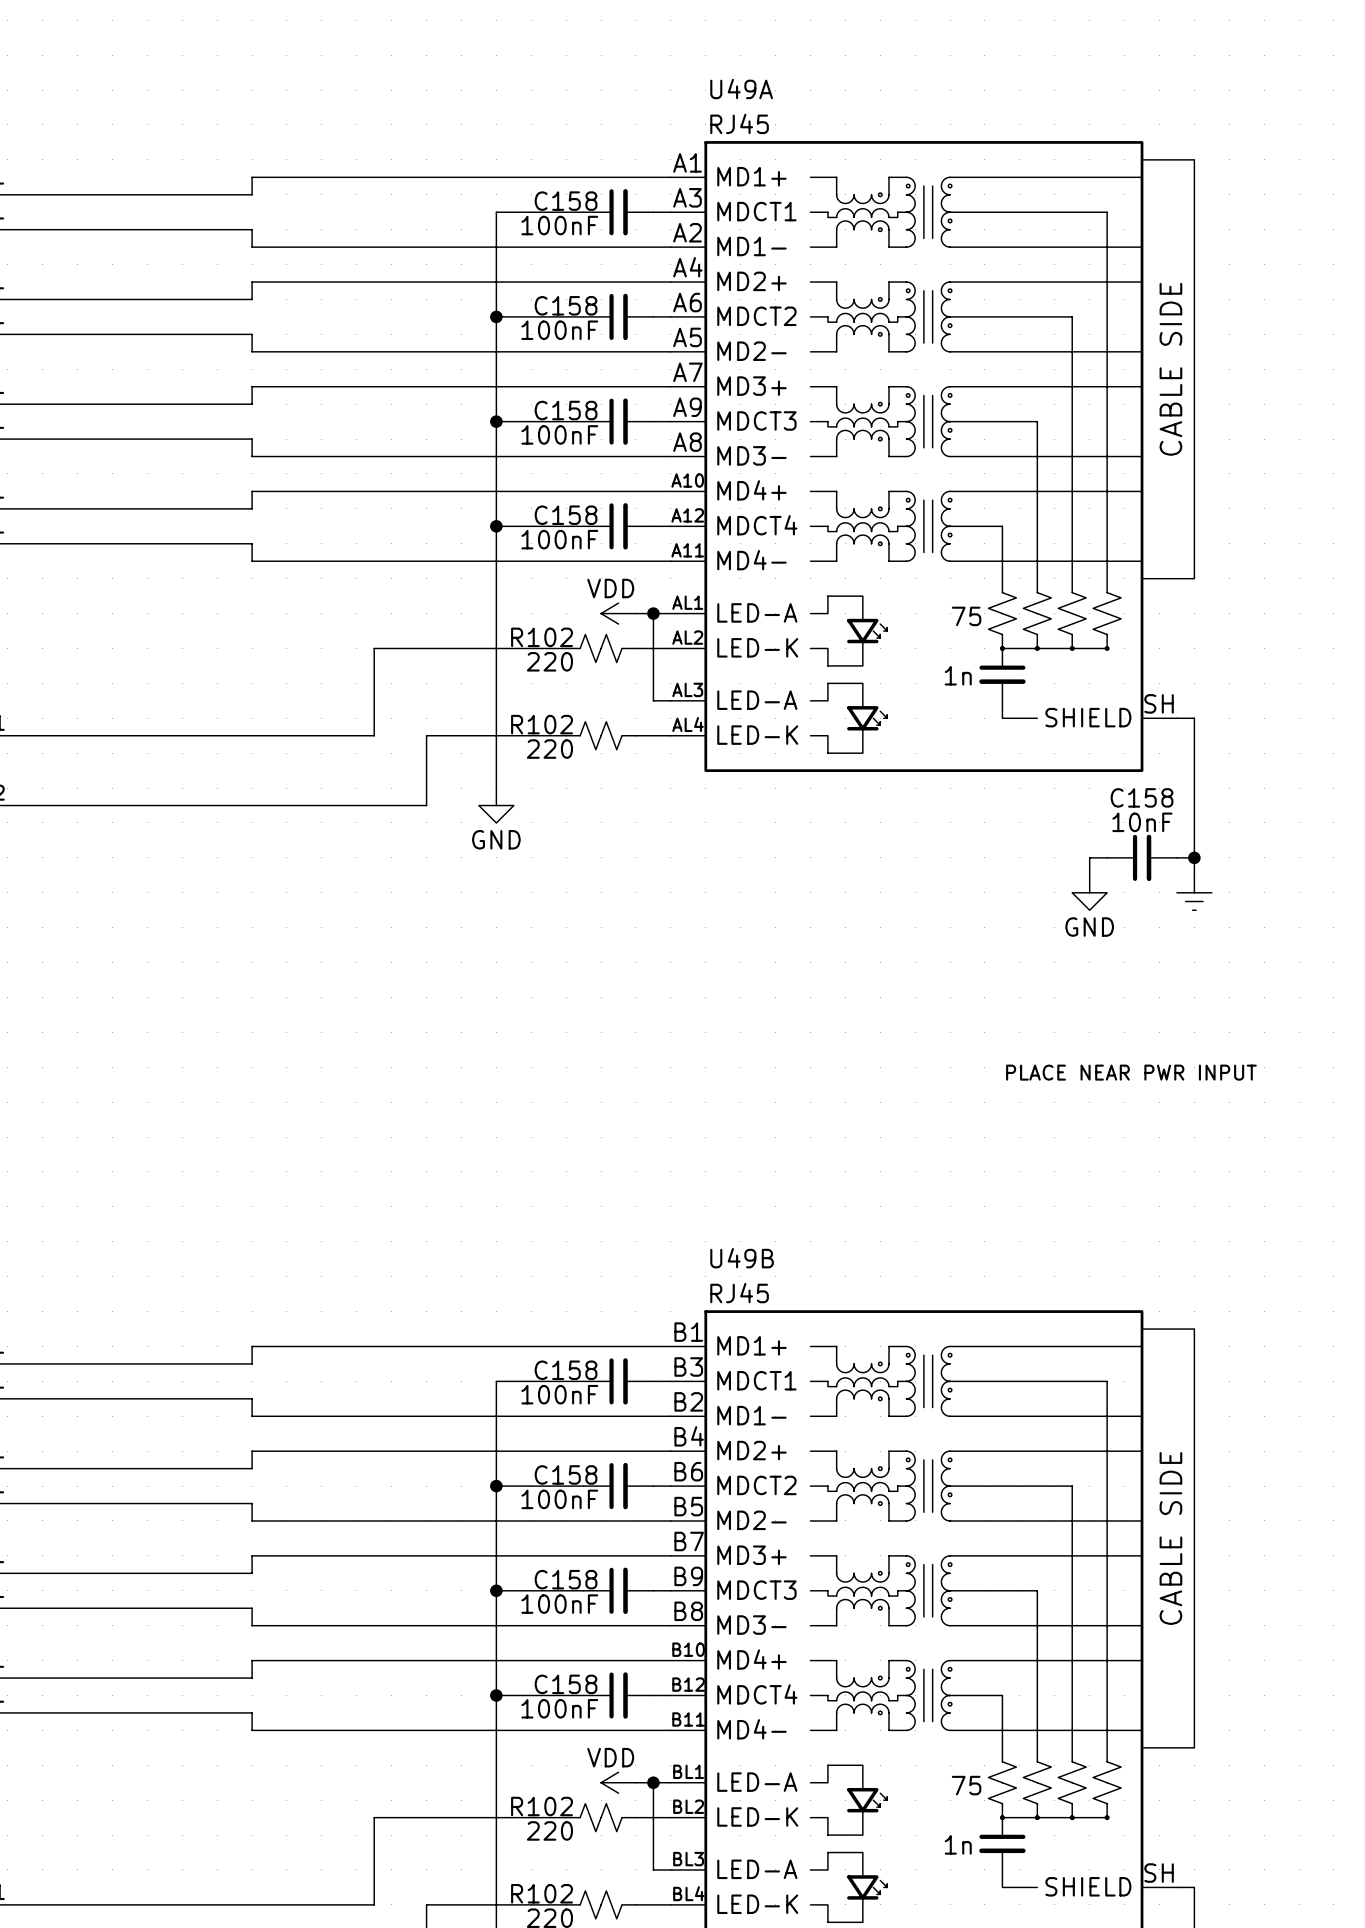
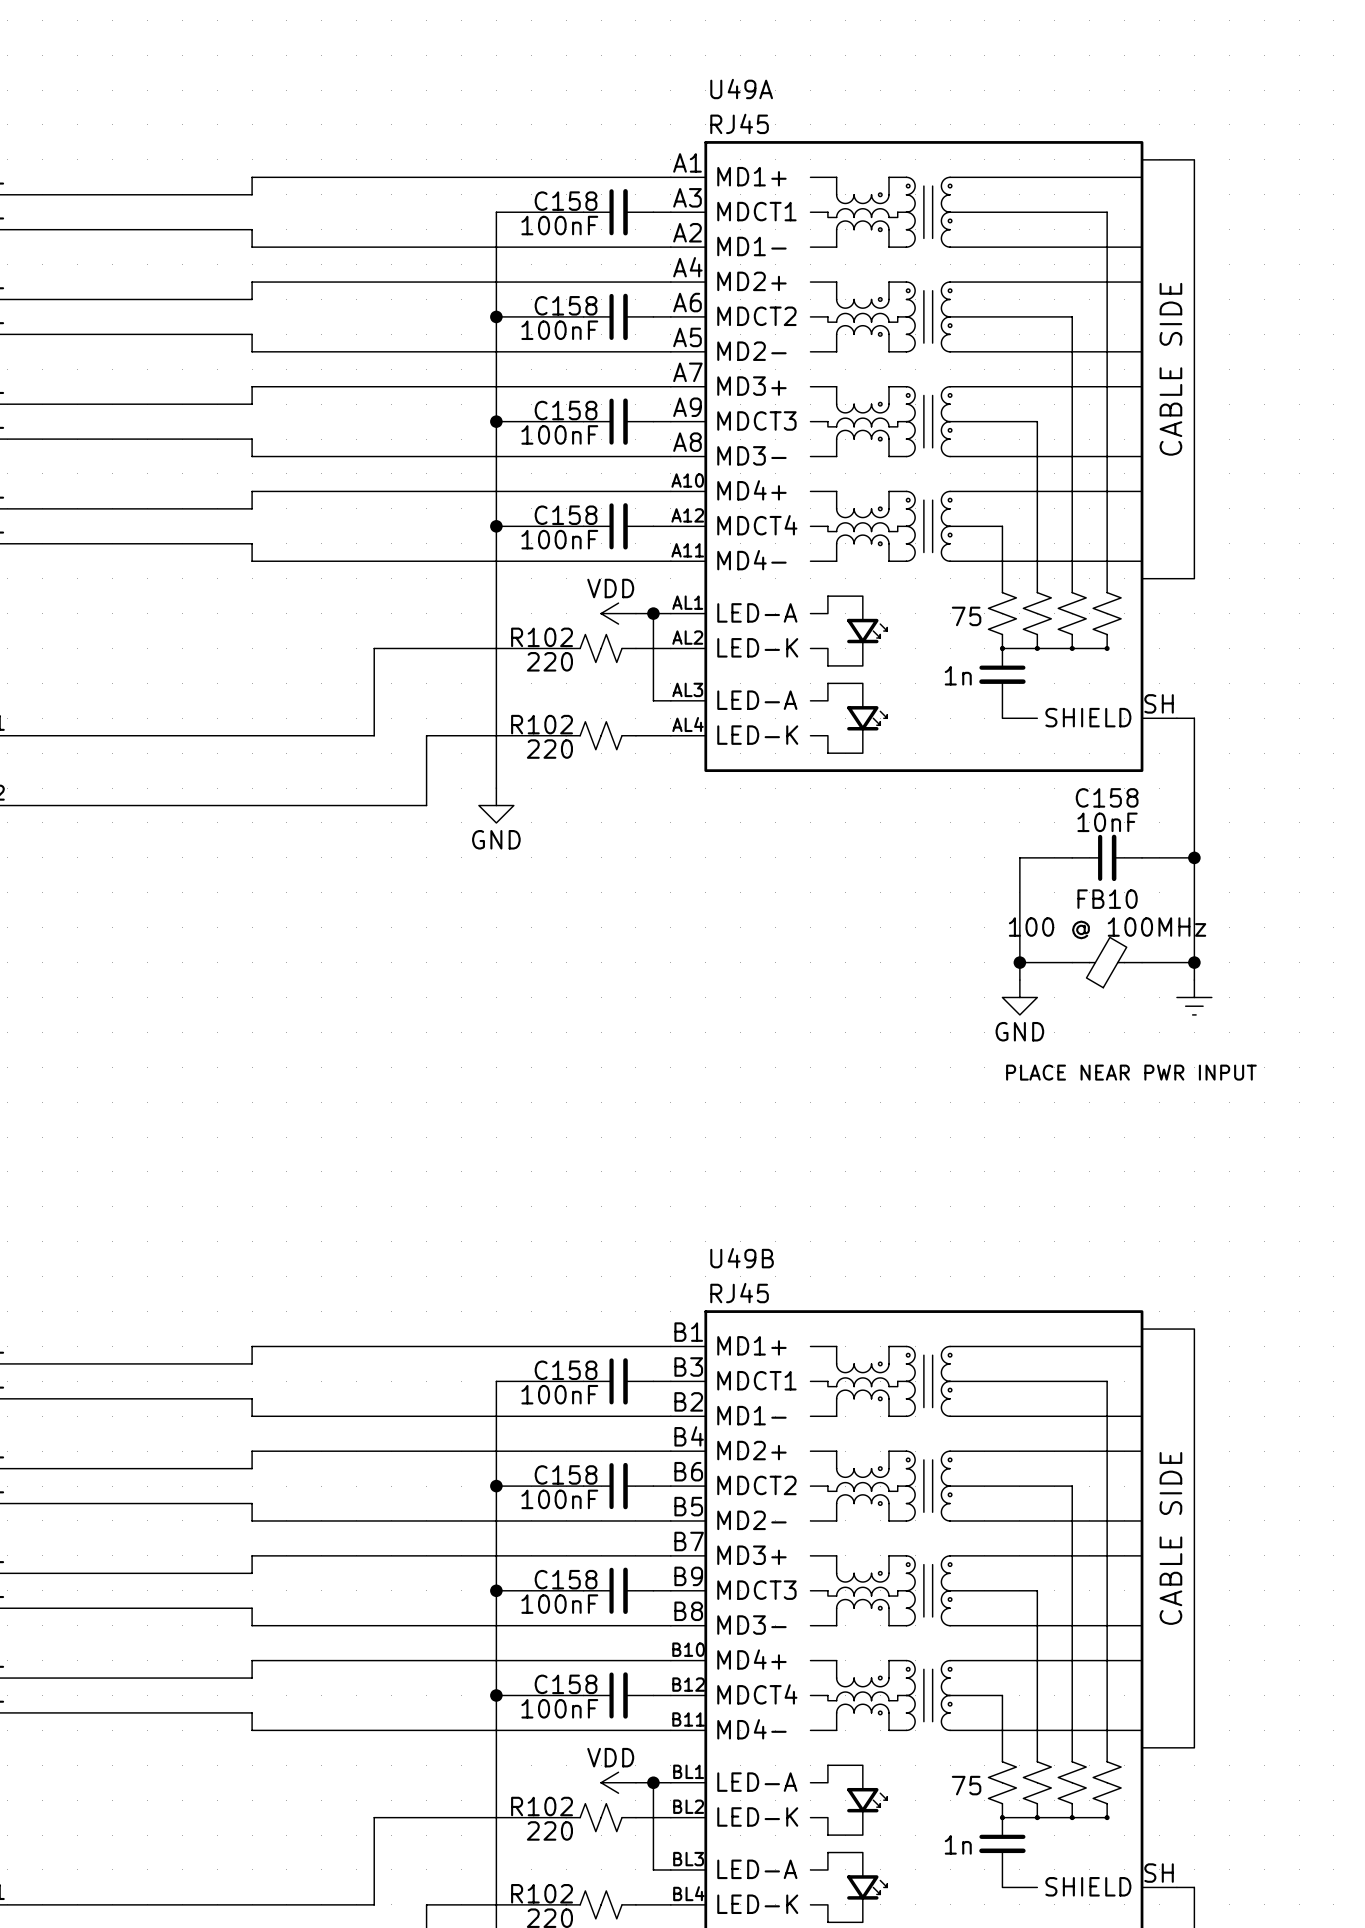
wire: none -> (1072, 857) (1019, 857) (1019, 980)
wire: (1107, 857) (1089, 857) (1089, 875) -> none
C158 position: (1142, 857) -> (1107, 857)
wire: none -> (1194, 875) (1194, 980)
power symbol position: GND (1089, 892) -> GND (1019, 997)
power symbol position: (1194, 892) -> (1194, 997)
wire: none -> (1019, 962) (1072, 962)
junction: none -> (1019, 962)
FB10: none -> 100 @ 100MHz (1107, 962)
wire: none -> (1142, 962) (1194, 962)
junction: none -> (1194, 962)

